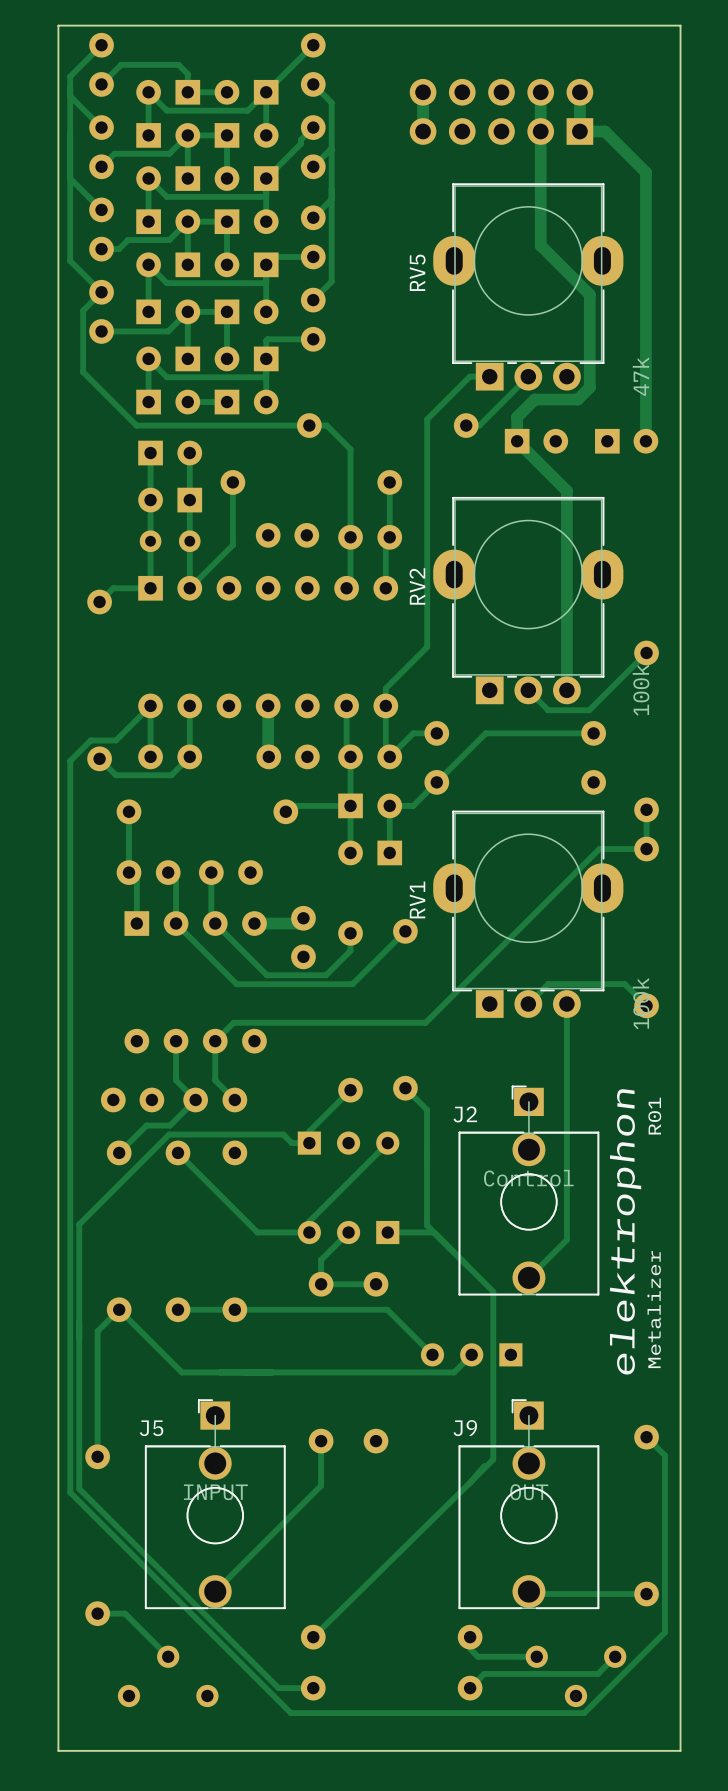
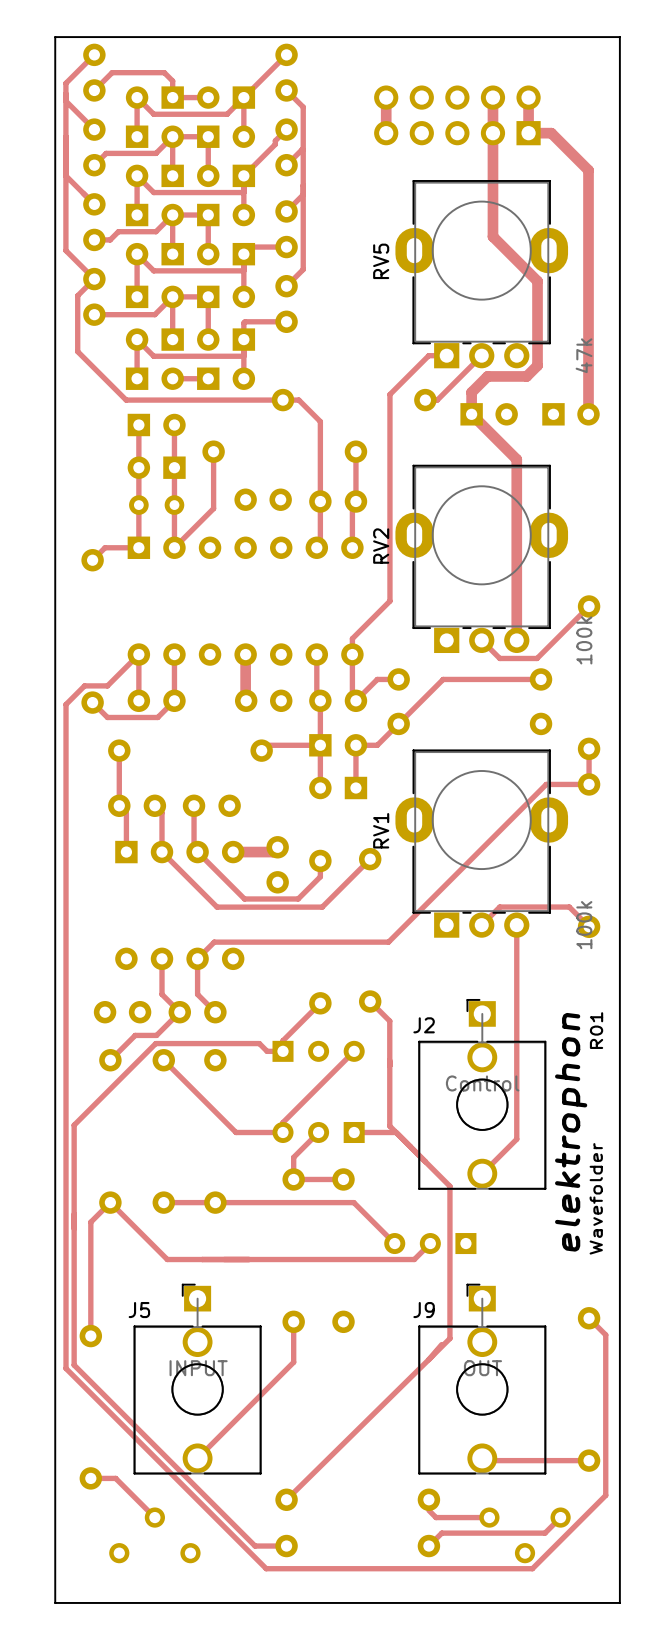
drawing shape: [609, 1088, 662, 1375] -> [555, 1012, 604, 1255]

